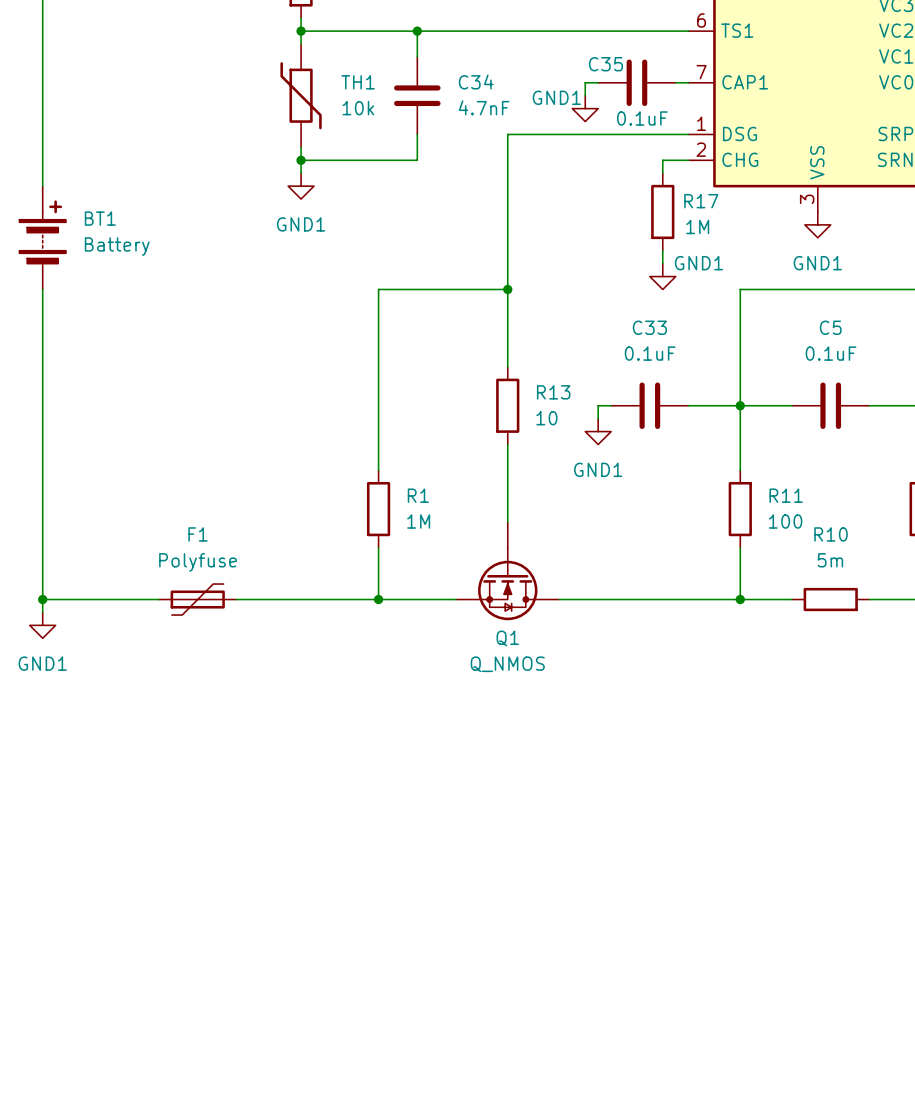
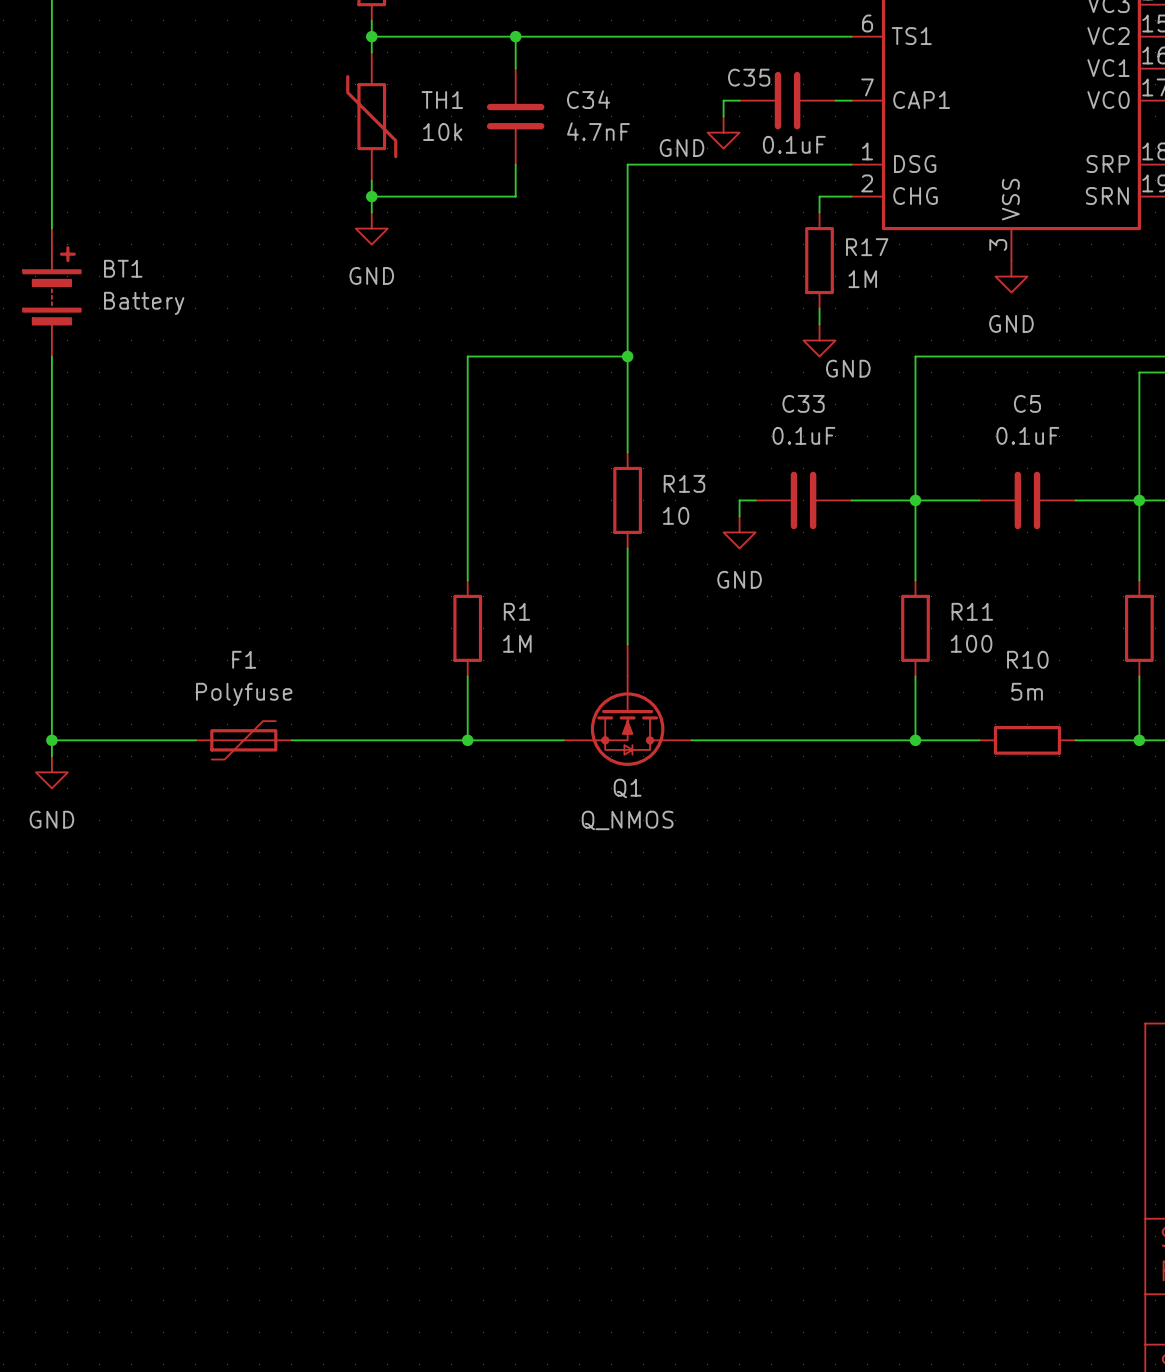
power symbol: GND1 (585, 108) -> GND (723, 132)
power symbol: GND1 (301, 186) -> GND (371, 228)
power symbol: GND1 (817, 224) -> GND (1011, 276)
power symbol: GND1 (662, 276) -> GND (819, 340)
power symbol: GND1 (598, 431) -> GND (739, 532)
power symbol: GND1 (42, 625) -> GND (51, 772)

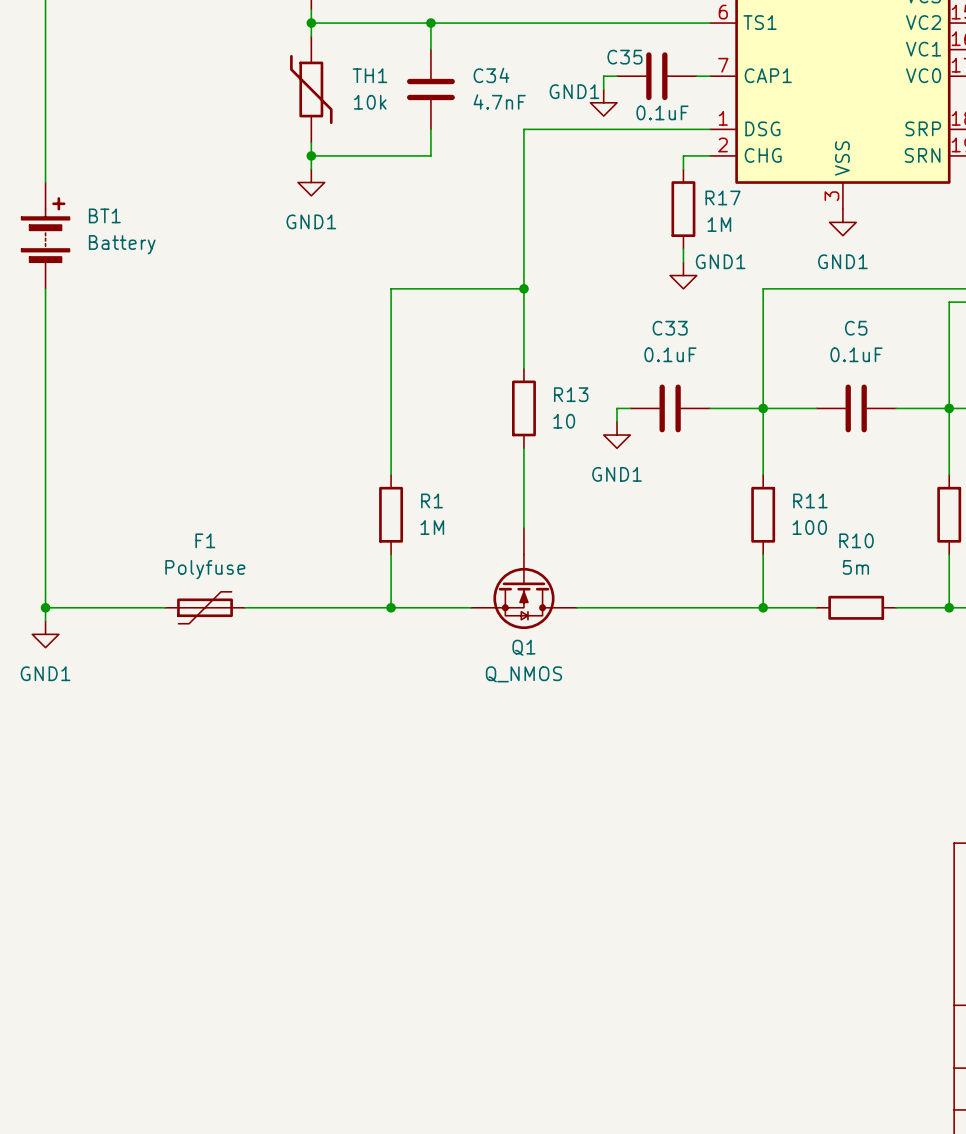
power symbol: GND (723, 132) -> GND1 (603, 102)
power symbol: GND (371, 228) -> GND1 (311, 182)
power symbol: GND (1011, 276) -> GND1 (842, 222)
power symbol: GND (819, 340) -> GND1 (683, 275)
power symbol: GND (739, 532) -> GND1 (616, 435)
power symbol: GND (51, 772) -> GND1 (45, 634)

